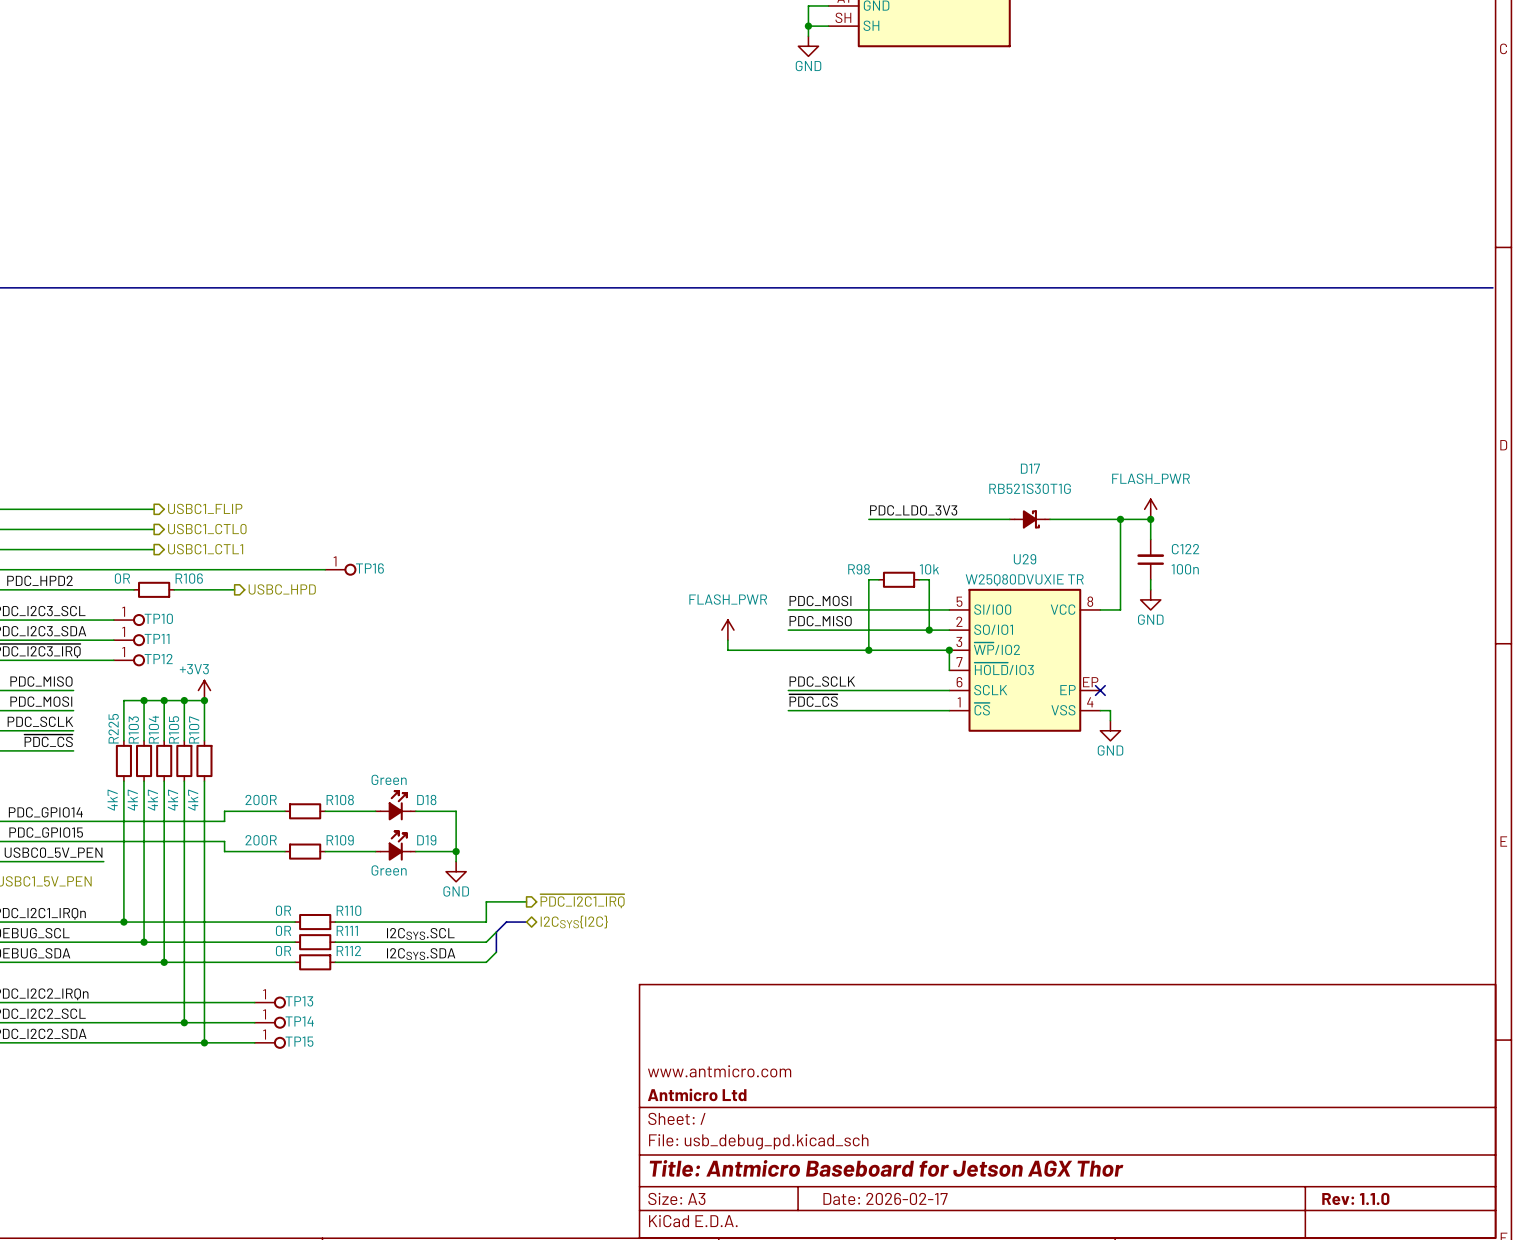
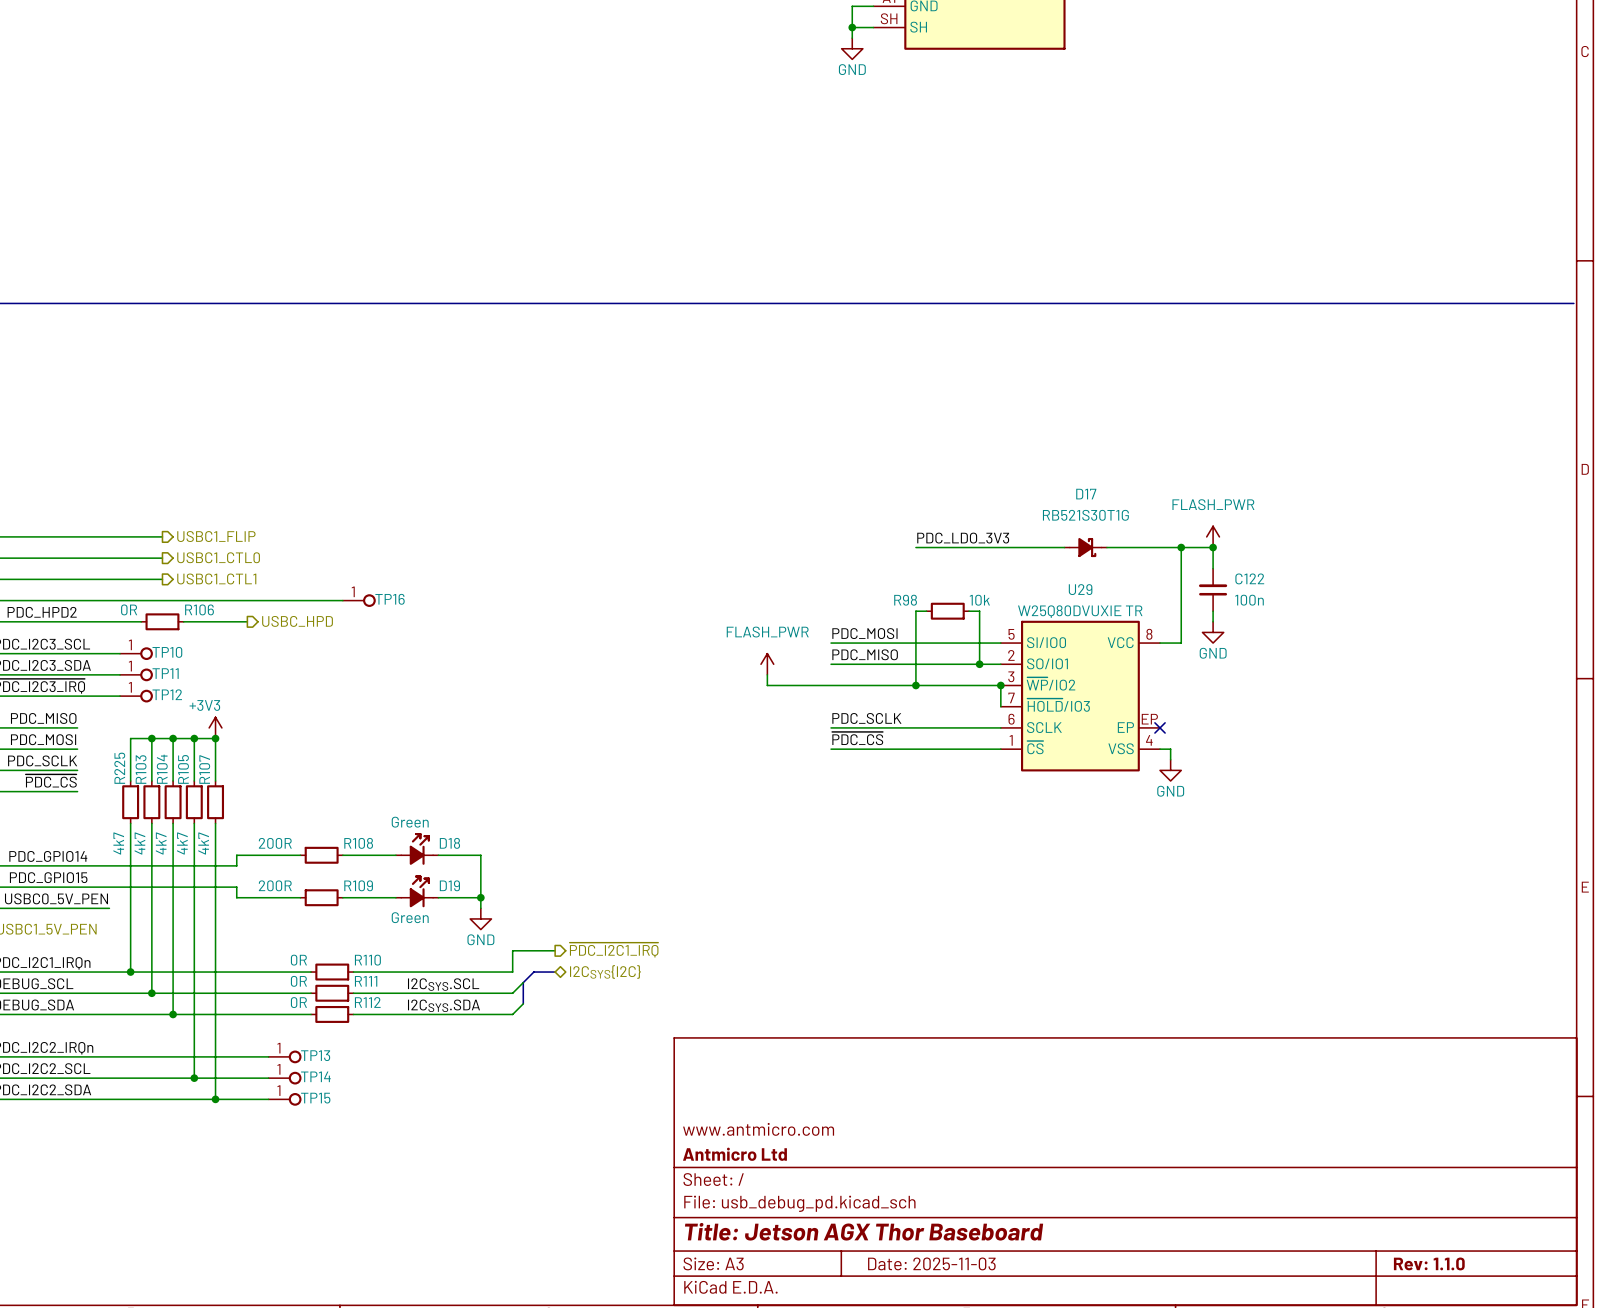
title block: Title: Antmicro Baseboard for Jetson AGX Thor (886, 1168) -> Title: Jetson AGX Thor Baseboard (864, 1231)
title block: Date: 2026-02-17 (885, 1198) -> Date: 2025-11-03 (931, 1263)

